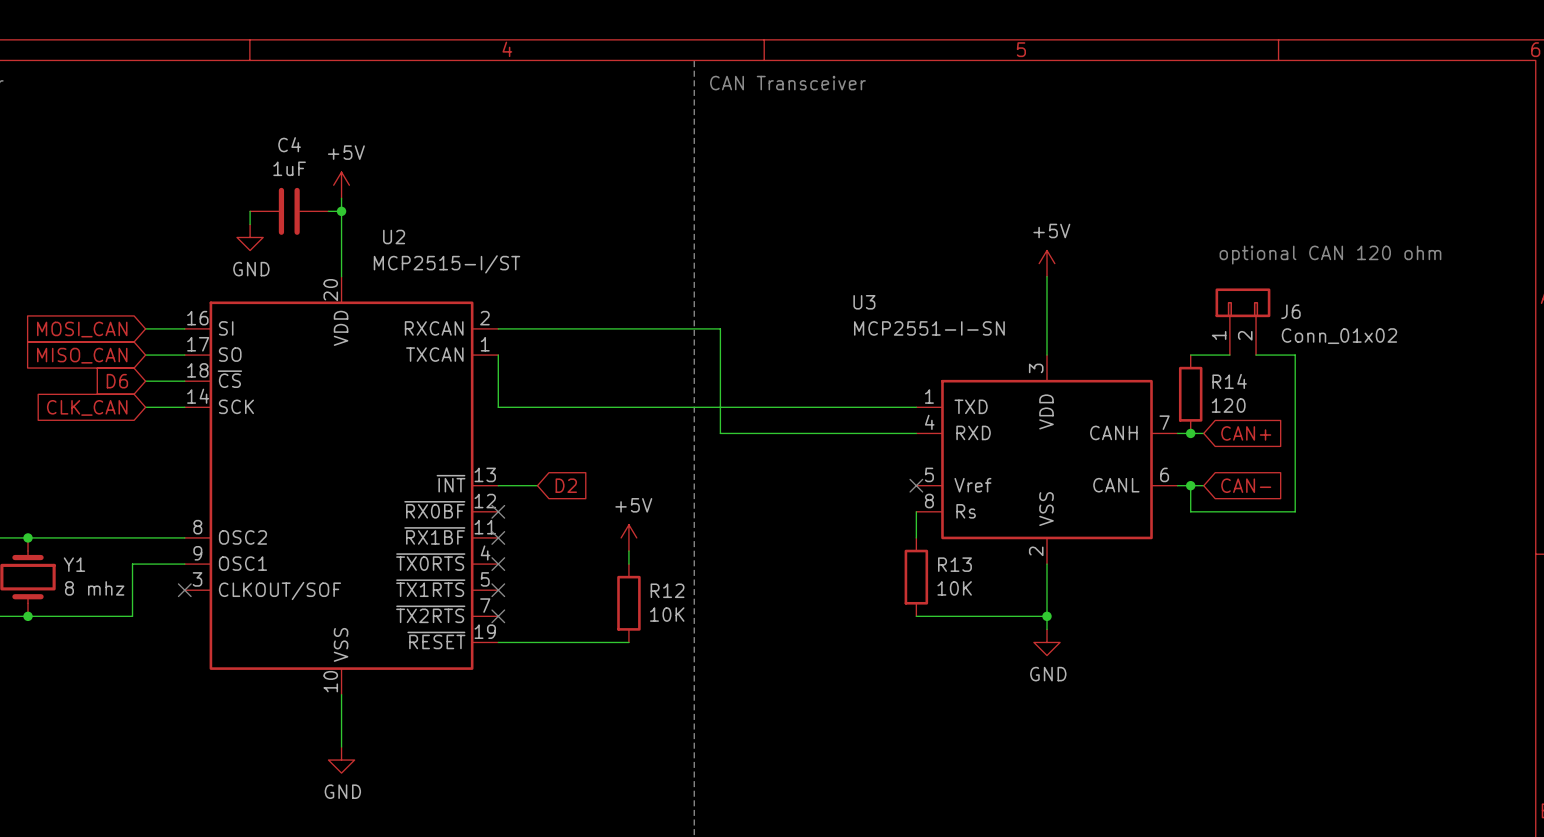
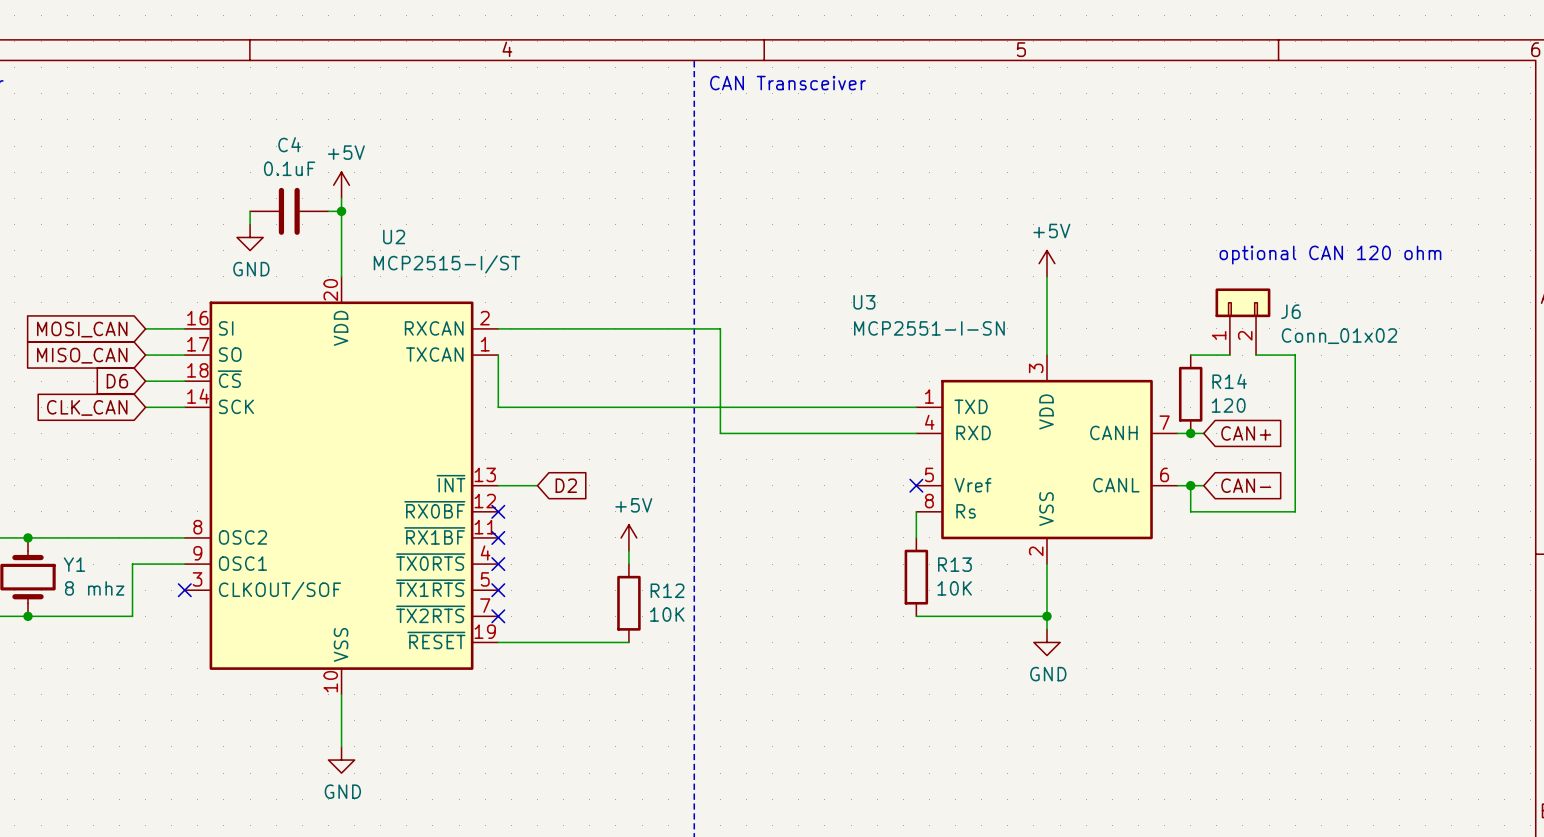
C4 value: 1uF (289, 168) -> 0.1uF (289, 168)

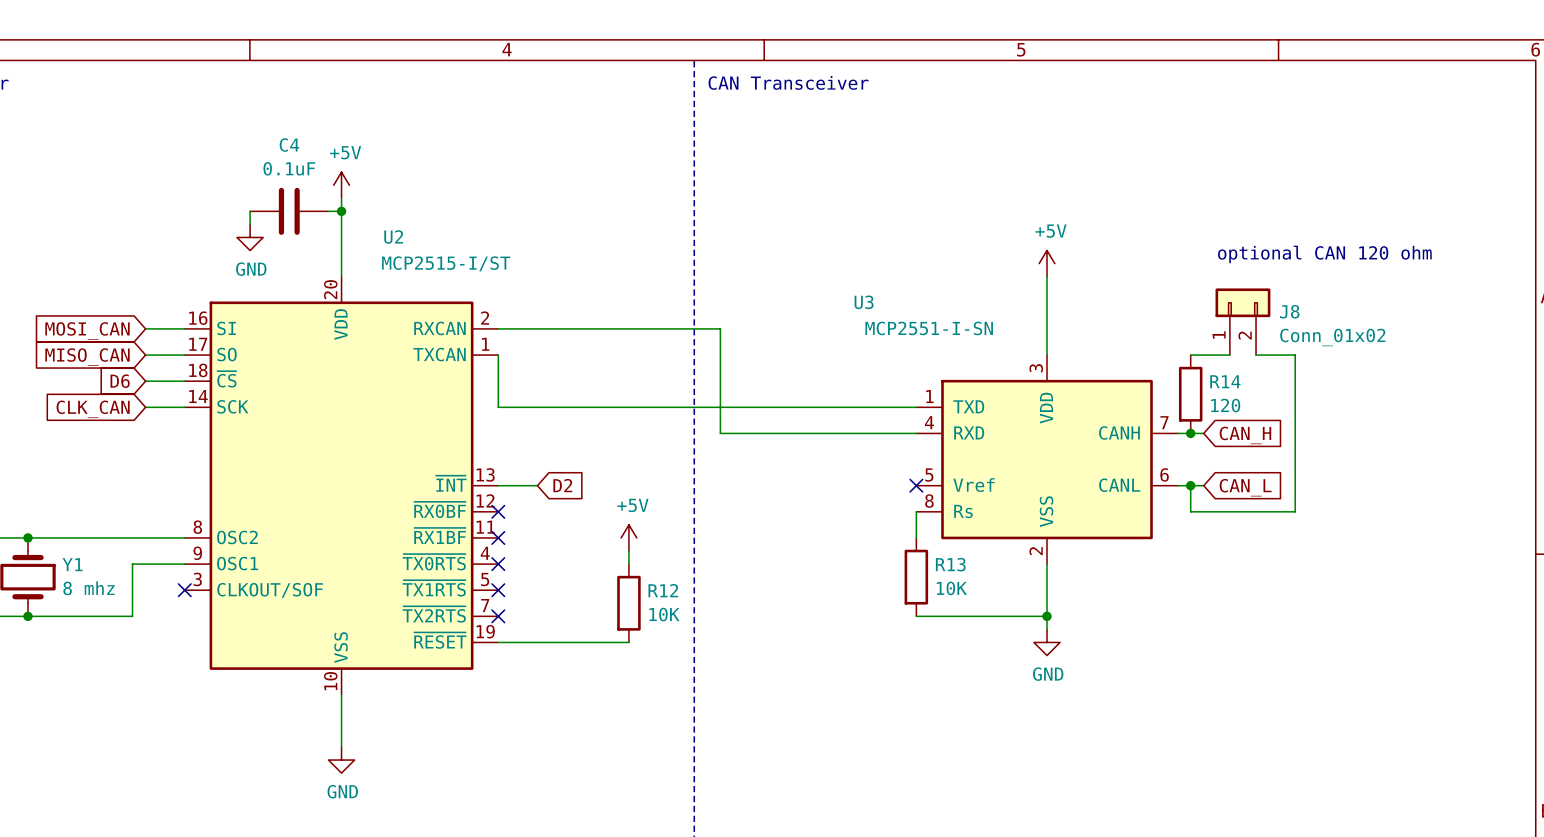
J6 name: J6 (1290, 311) -> J8 (1289, 311)
global label: CAN+ (1246, 433) -> CAN_H (1245, 435)
global label: CAN- (1246, 485) -> CAN_L (1245, 487)

